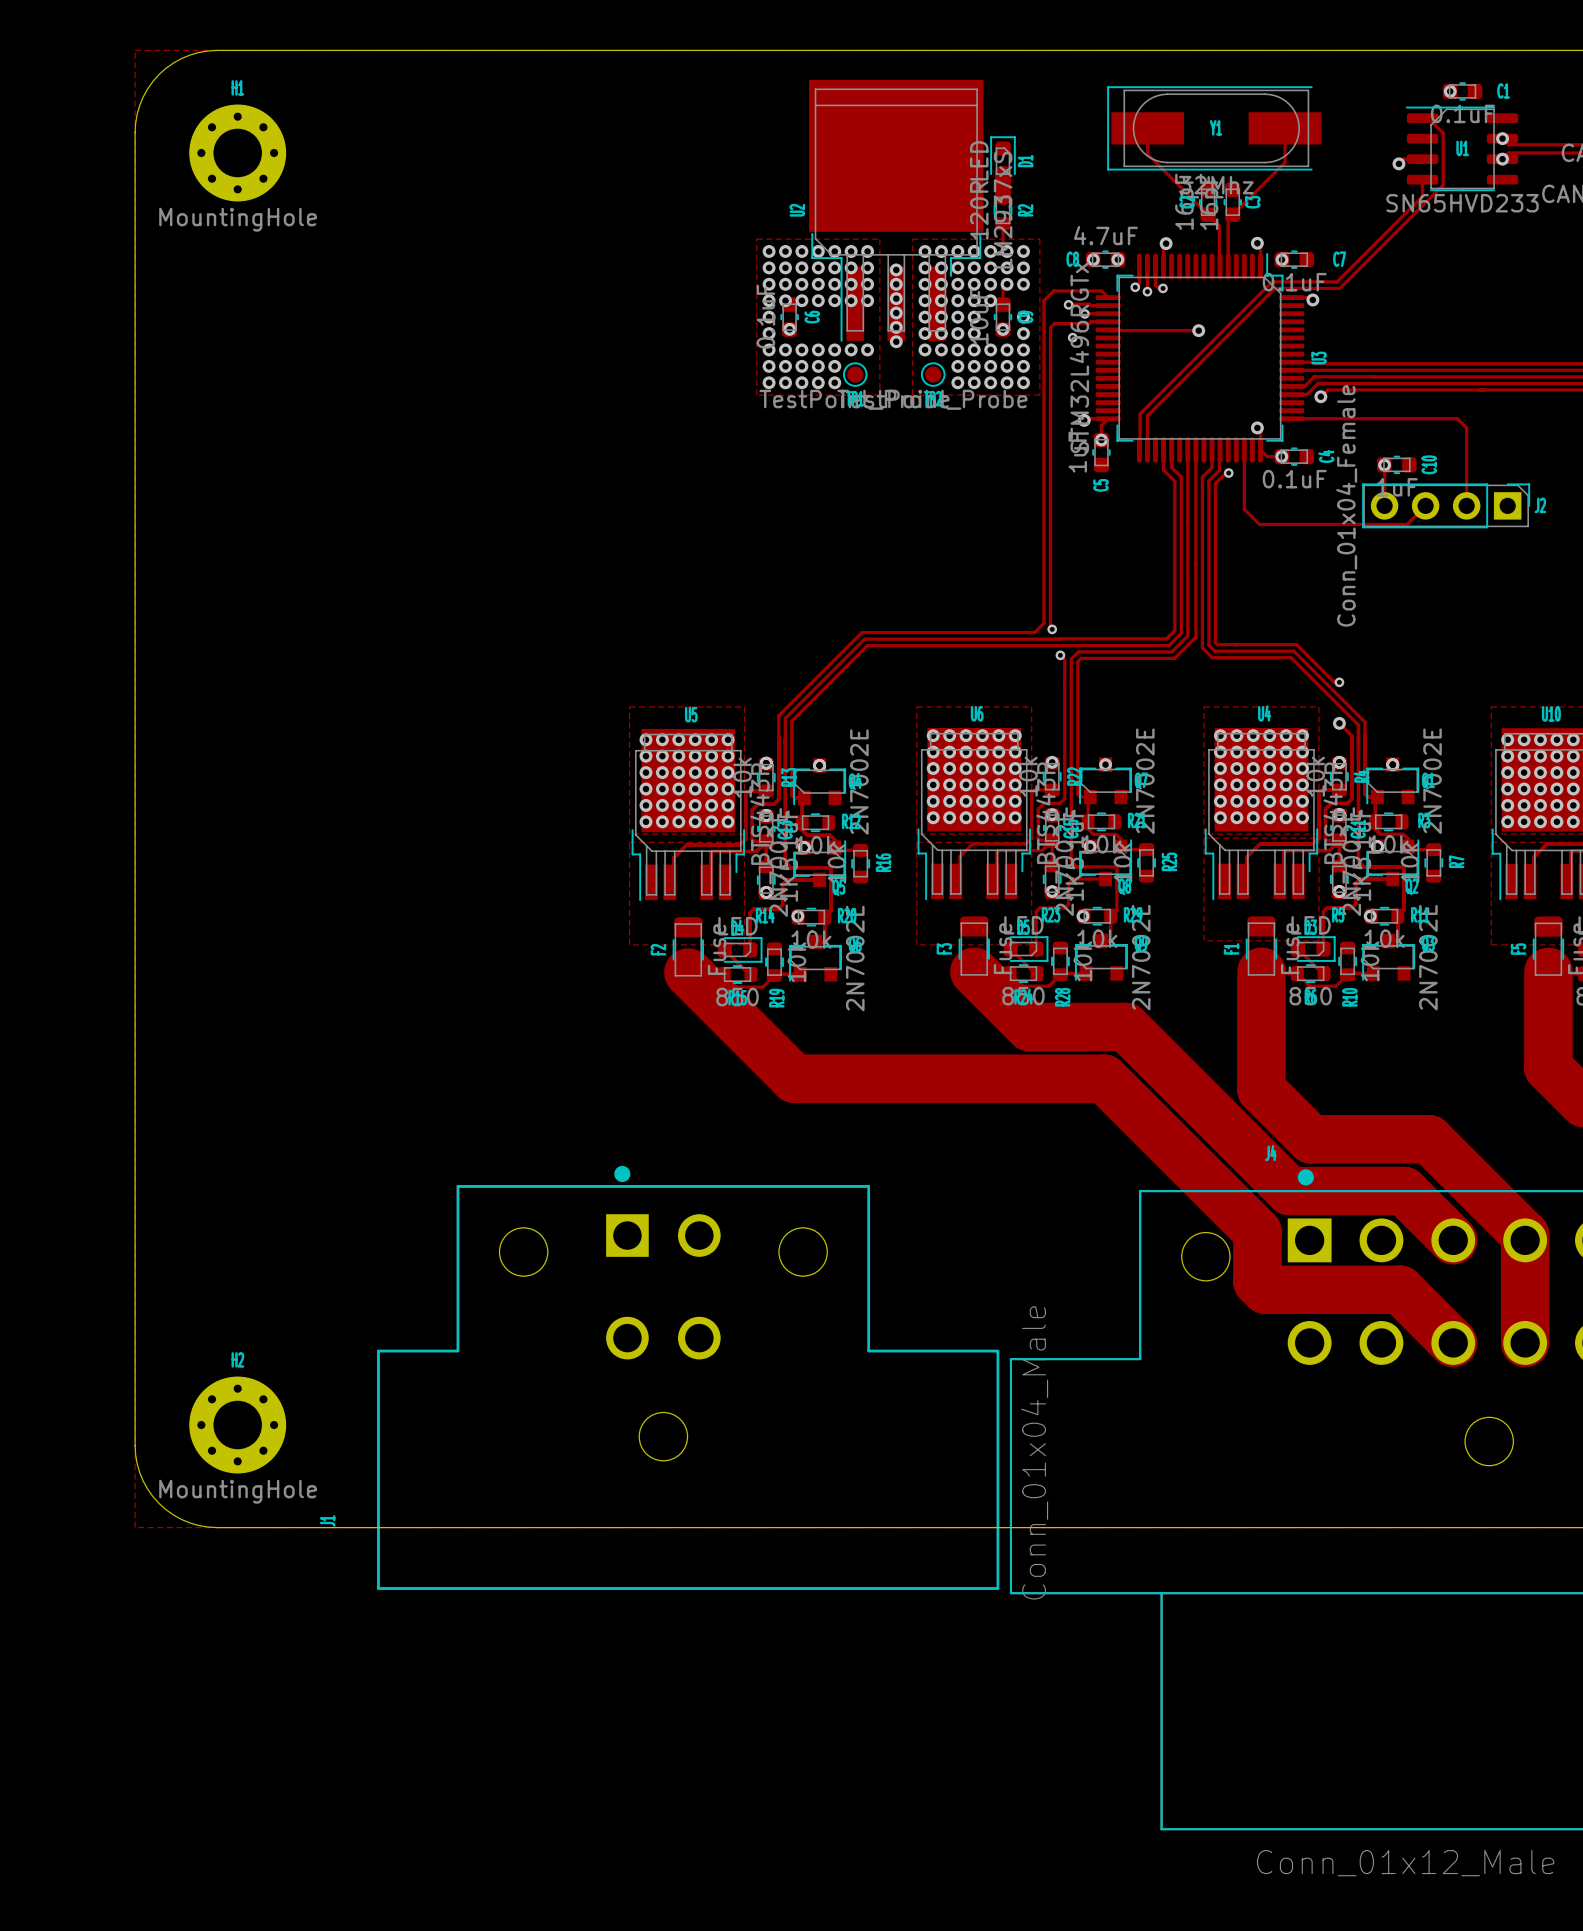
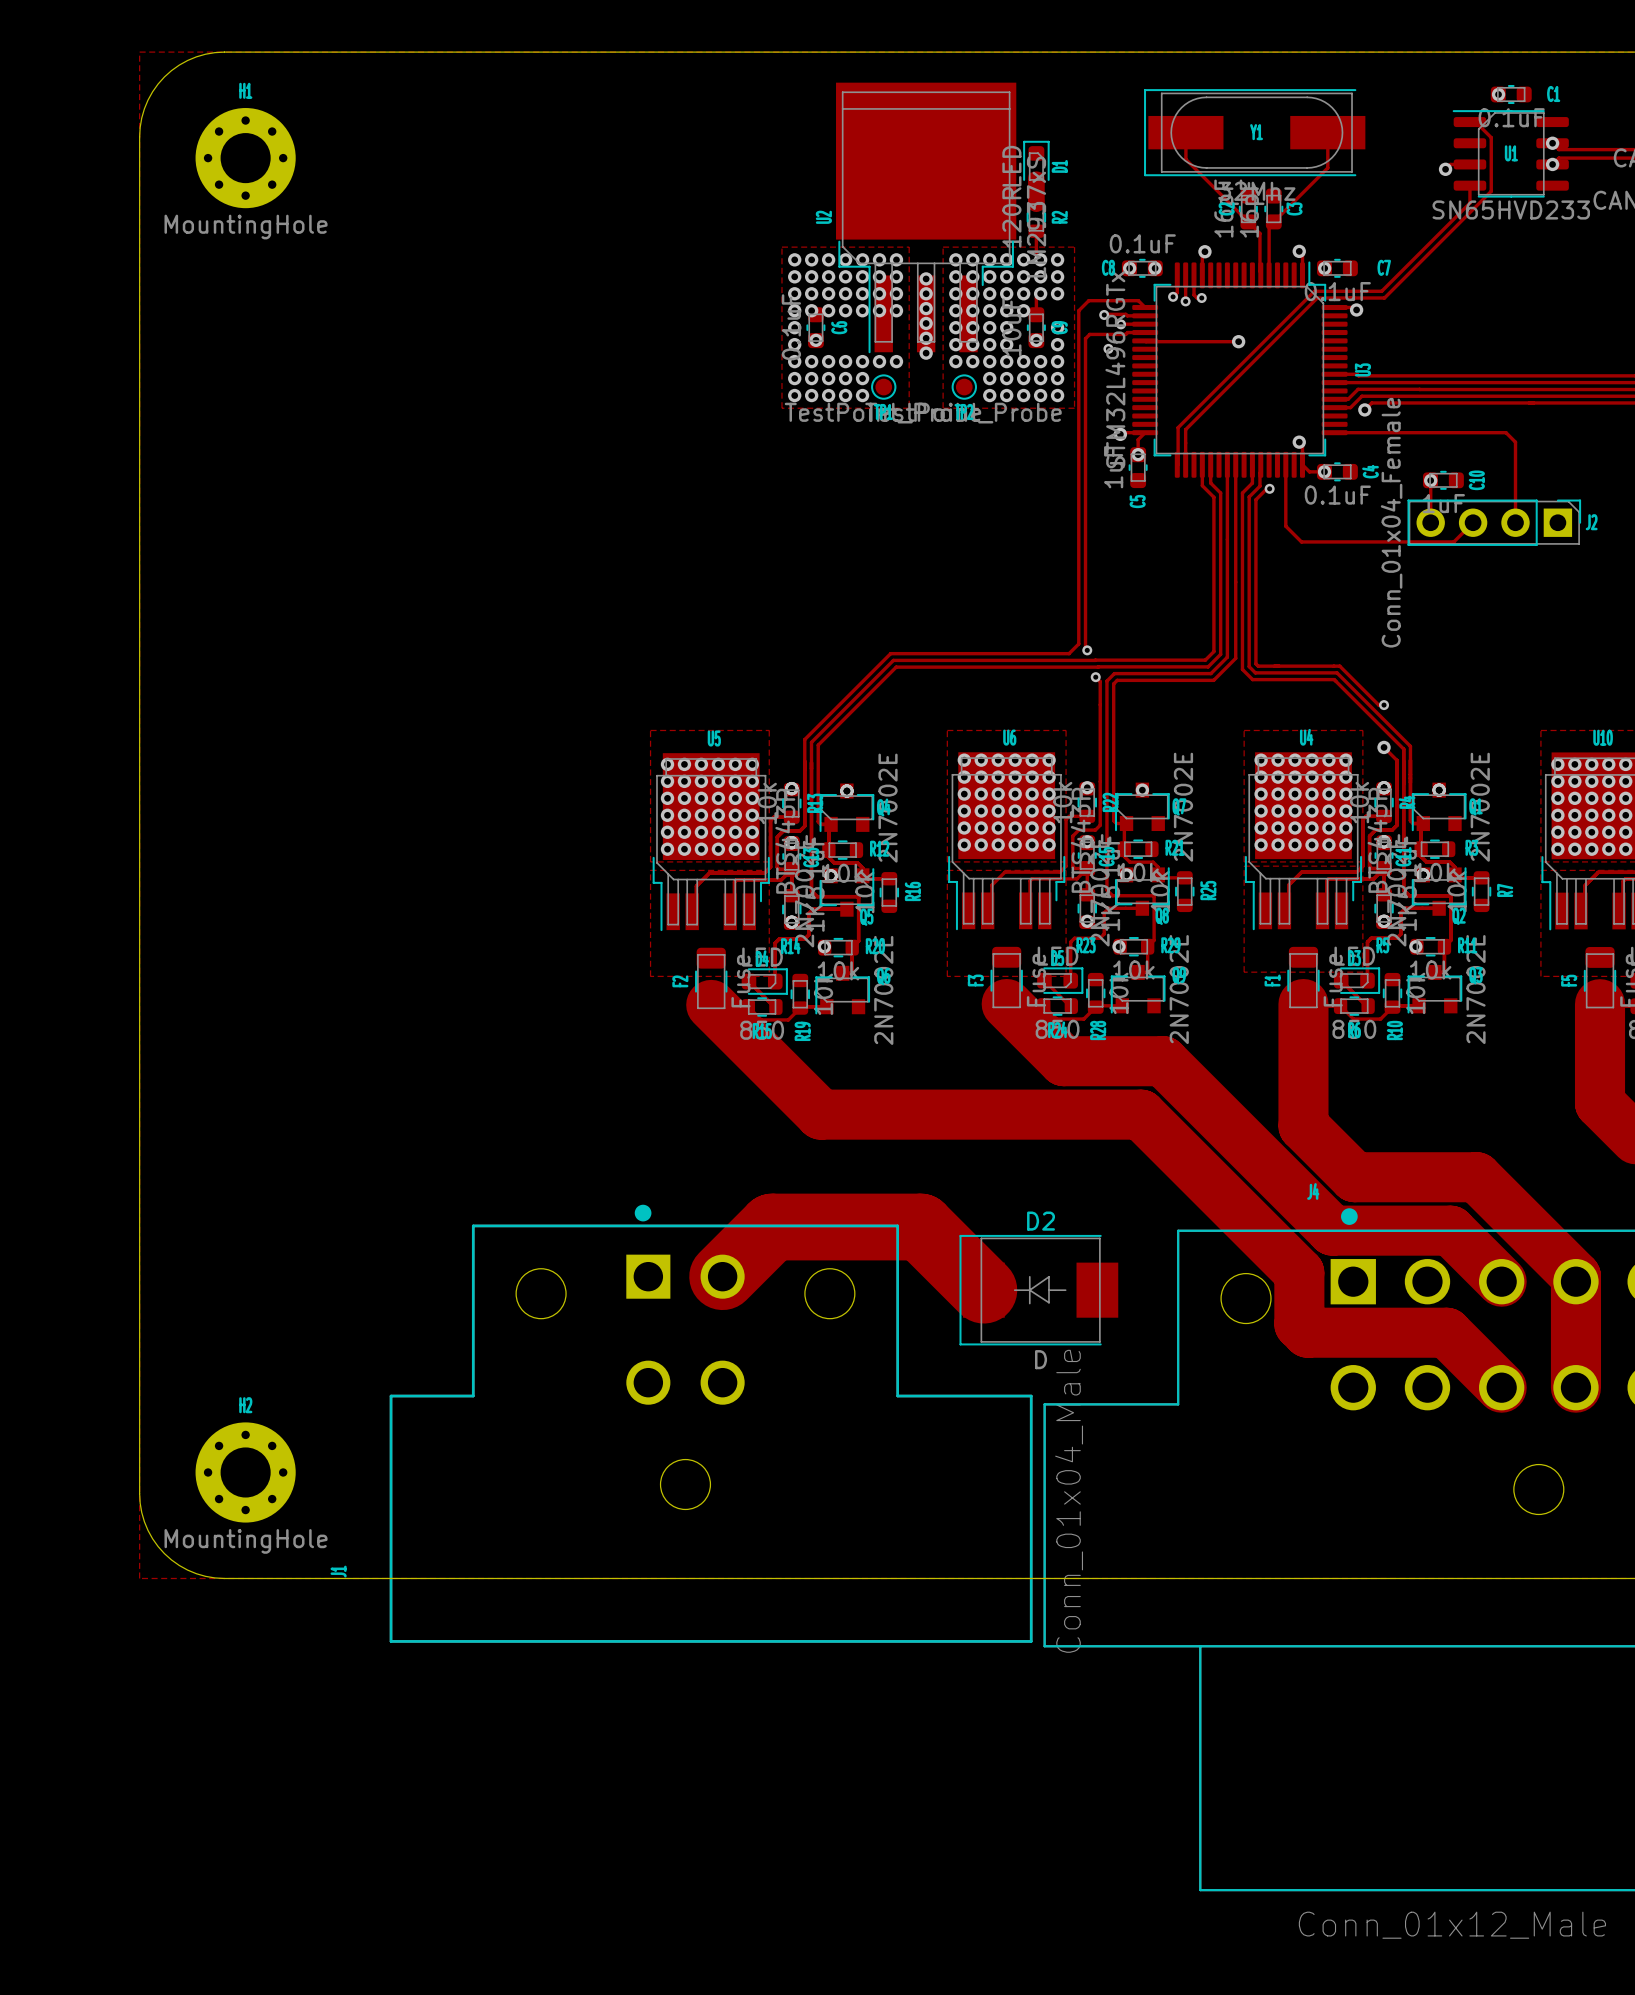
C8 value: 4.7uF (1105, 235) -> 0.1uF (1142, 243)
track: none -> (722, 1276) (772, 1227) (920, 1227) (983, 1290)
D2: none -> D (1038, 1290)

